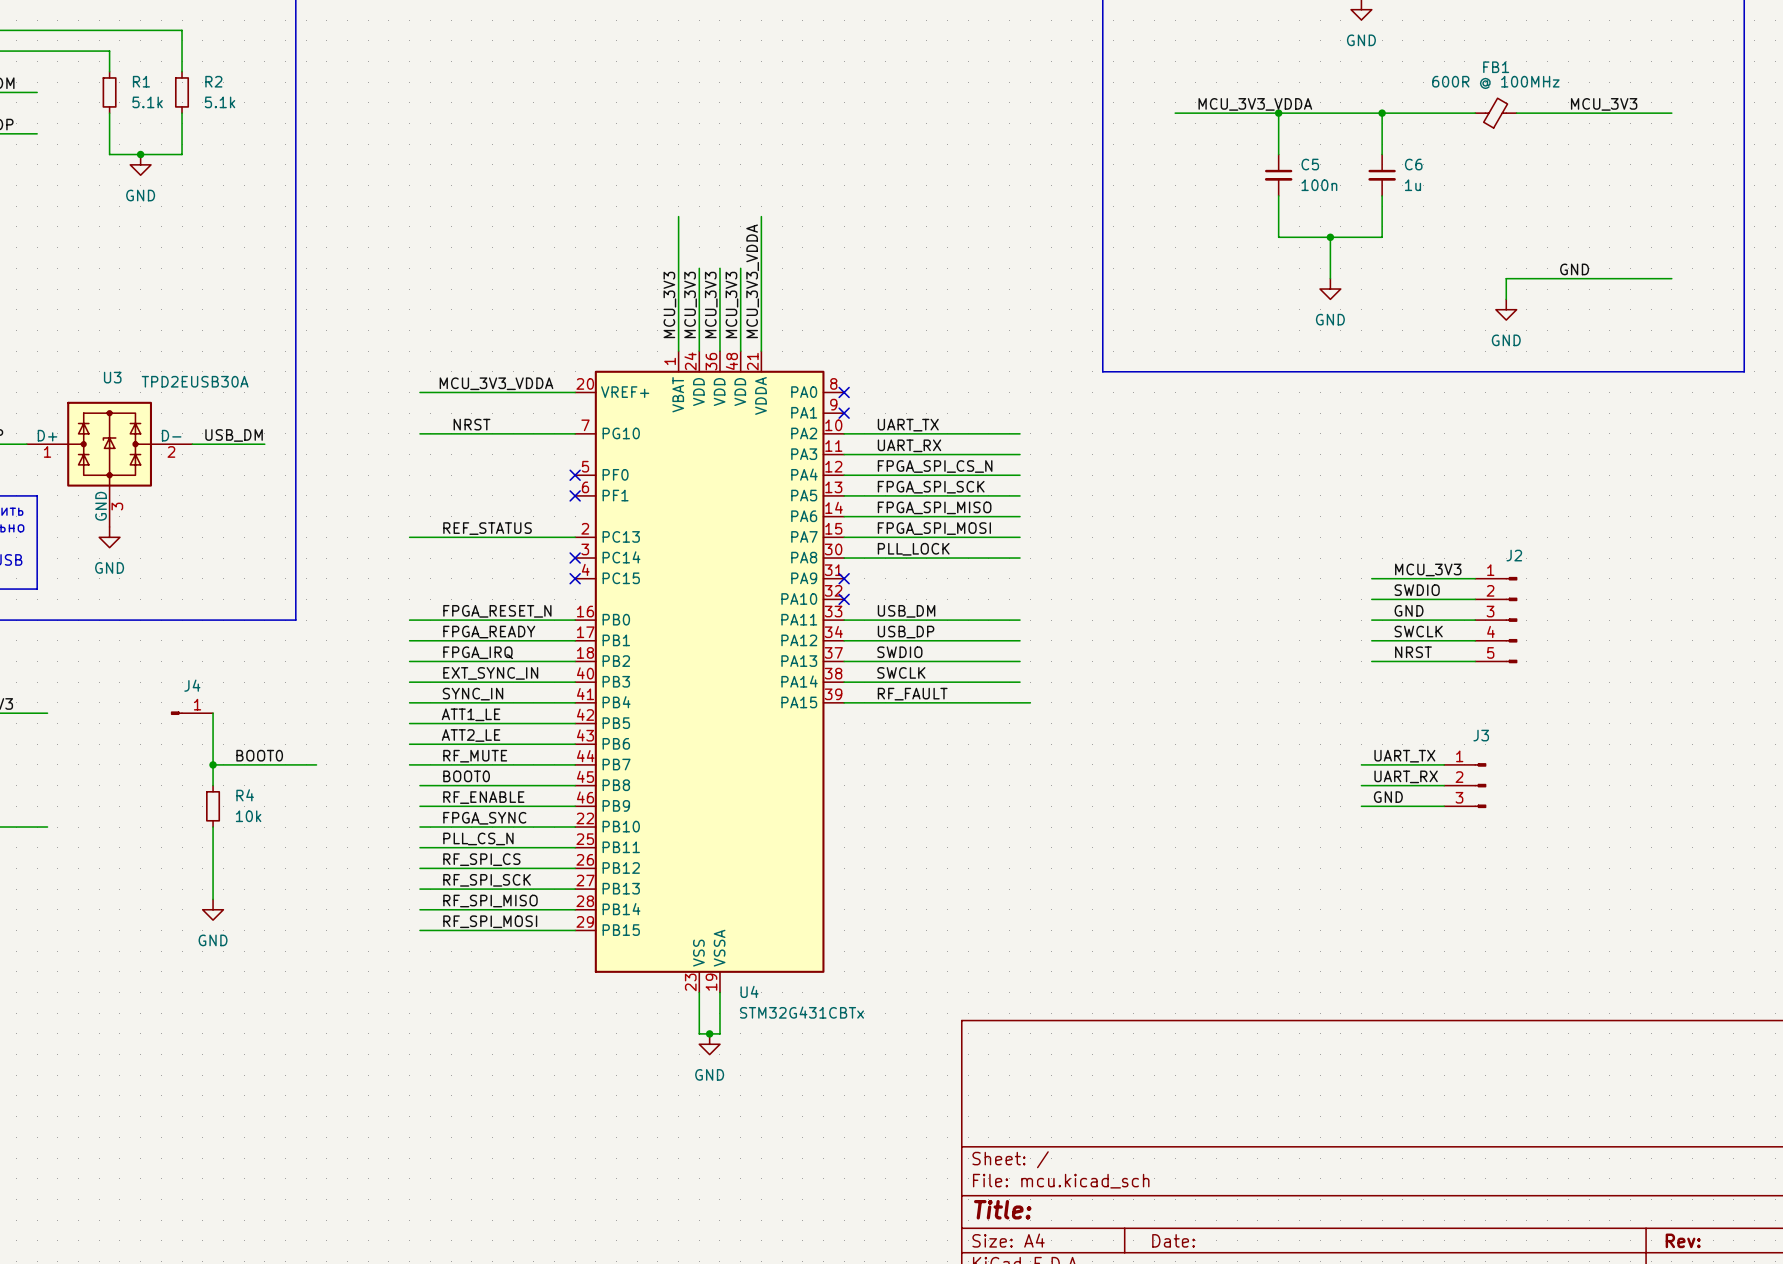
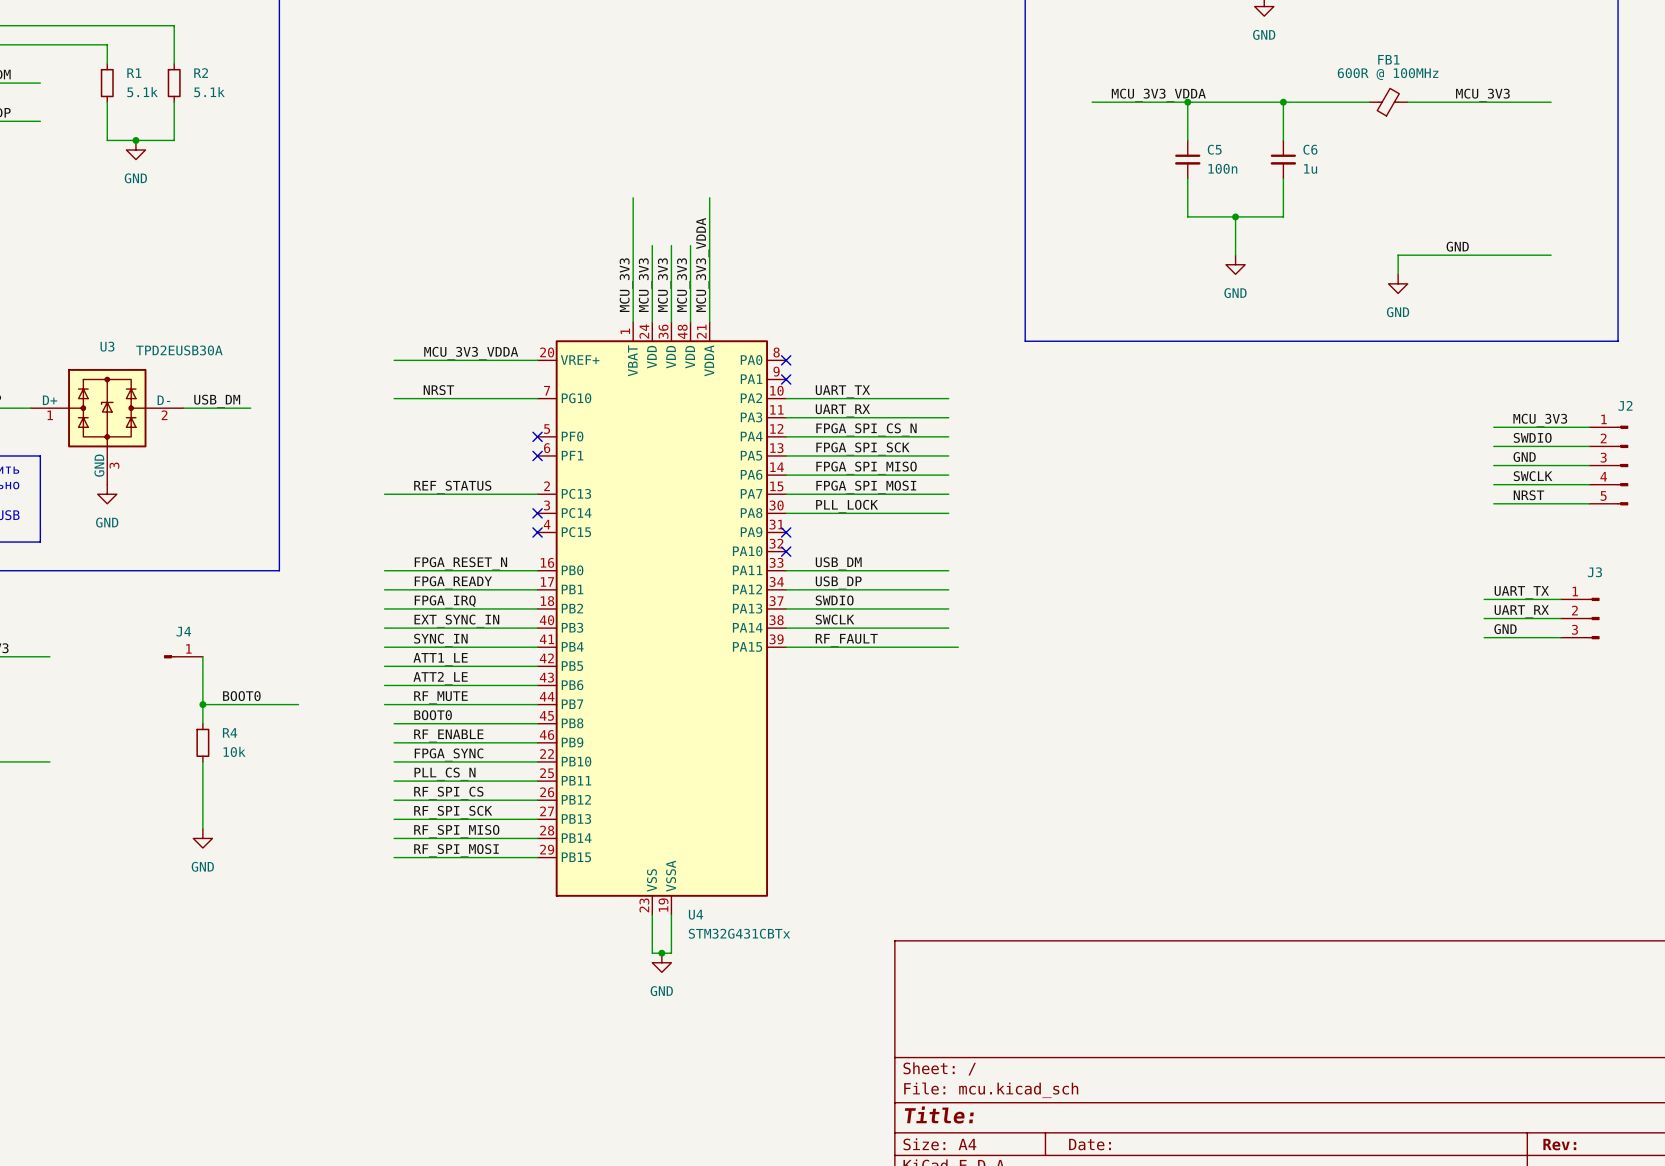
label: none -> MCU_3V3 (1540, 420)
wire: none -> (1493, 427) (1589, 427)
label: none -> SWDIO (1532, 437)
wire: none -> (1493, 446) (1589, 446)
label: none -> GND (1524, 457)
wire: none -> (1493, 465) (1589, 465)
label: none -> SWCLK (1533, 476)
wire: none -> (1493, 484) (1589, 484)
label: none -> NRST (1528, 495)
wire: none -> (1493, 503) (1589, 503)
label: MCU_3V3 (1428, 569) -> none
wire: (1371, 578) (1475, 578) -> none
label: SWDIO (1417, 590) -> none
wire: (1371, 599) (1475, 599) -> none
label: GND (1409, 610) -> none
wire: (1371, 620) (1475, 620) -> none
J2 position: (1496, 620) -> (1608, 465)
label: SWCLK (1418, 631) -> none
wire: (1371, 640) (1475, 640) -> none
label: none -> UART_TX (1521, 592)
wire: none -> (1484, 599) (1560, 599)
label: NRST (1413, 652) -> none
wire: (1371, 661) (1475, 661) -> none
label: none -> UART_RX (1521, 611)
wire: none -> (1484, 618) (1560, 618)
label: none -> GND (1505, 629)
wire: none -> (1484, 637) (1560, 637)
label: UART_TX (1404, 756) -> none
wire: (1361, 764) (1444, 764) -> none
label: UART_RX (1406, 776) -> none
wire: (1361, 785) (1444, 785) -> none
J3 position: (1465, 785) -> (1580, 618)
label: GND (1388, 797) -> none
wire: (1361, 806) (1444, 806) -> none

